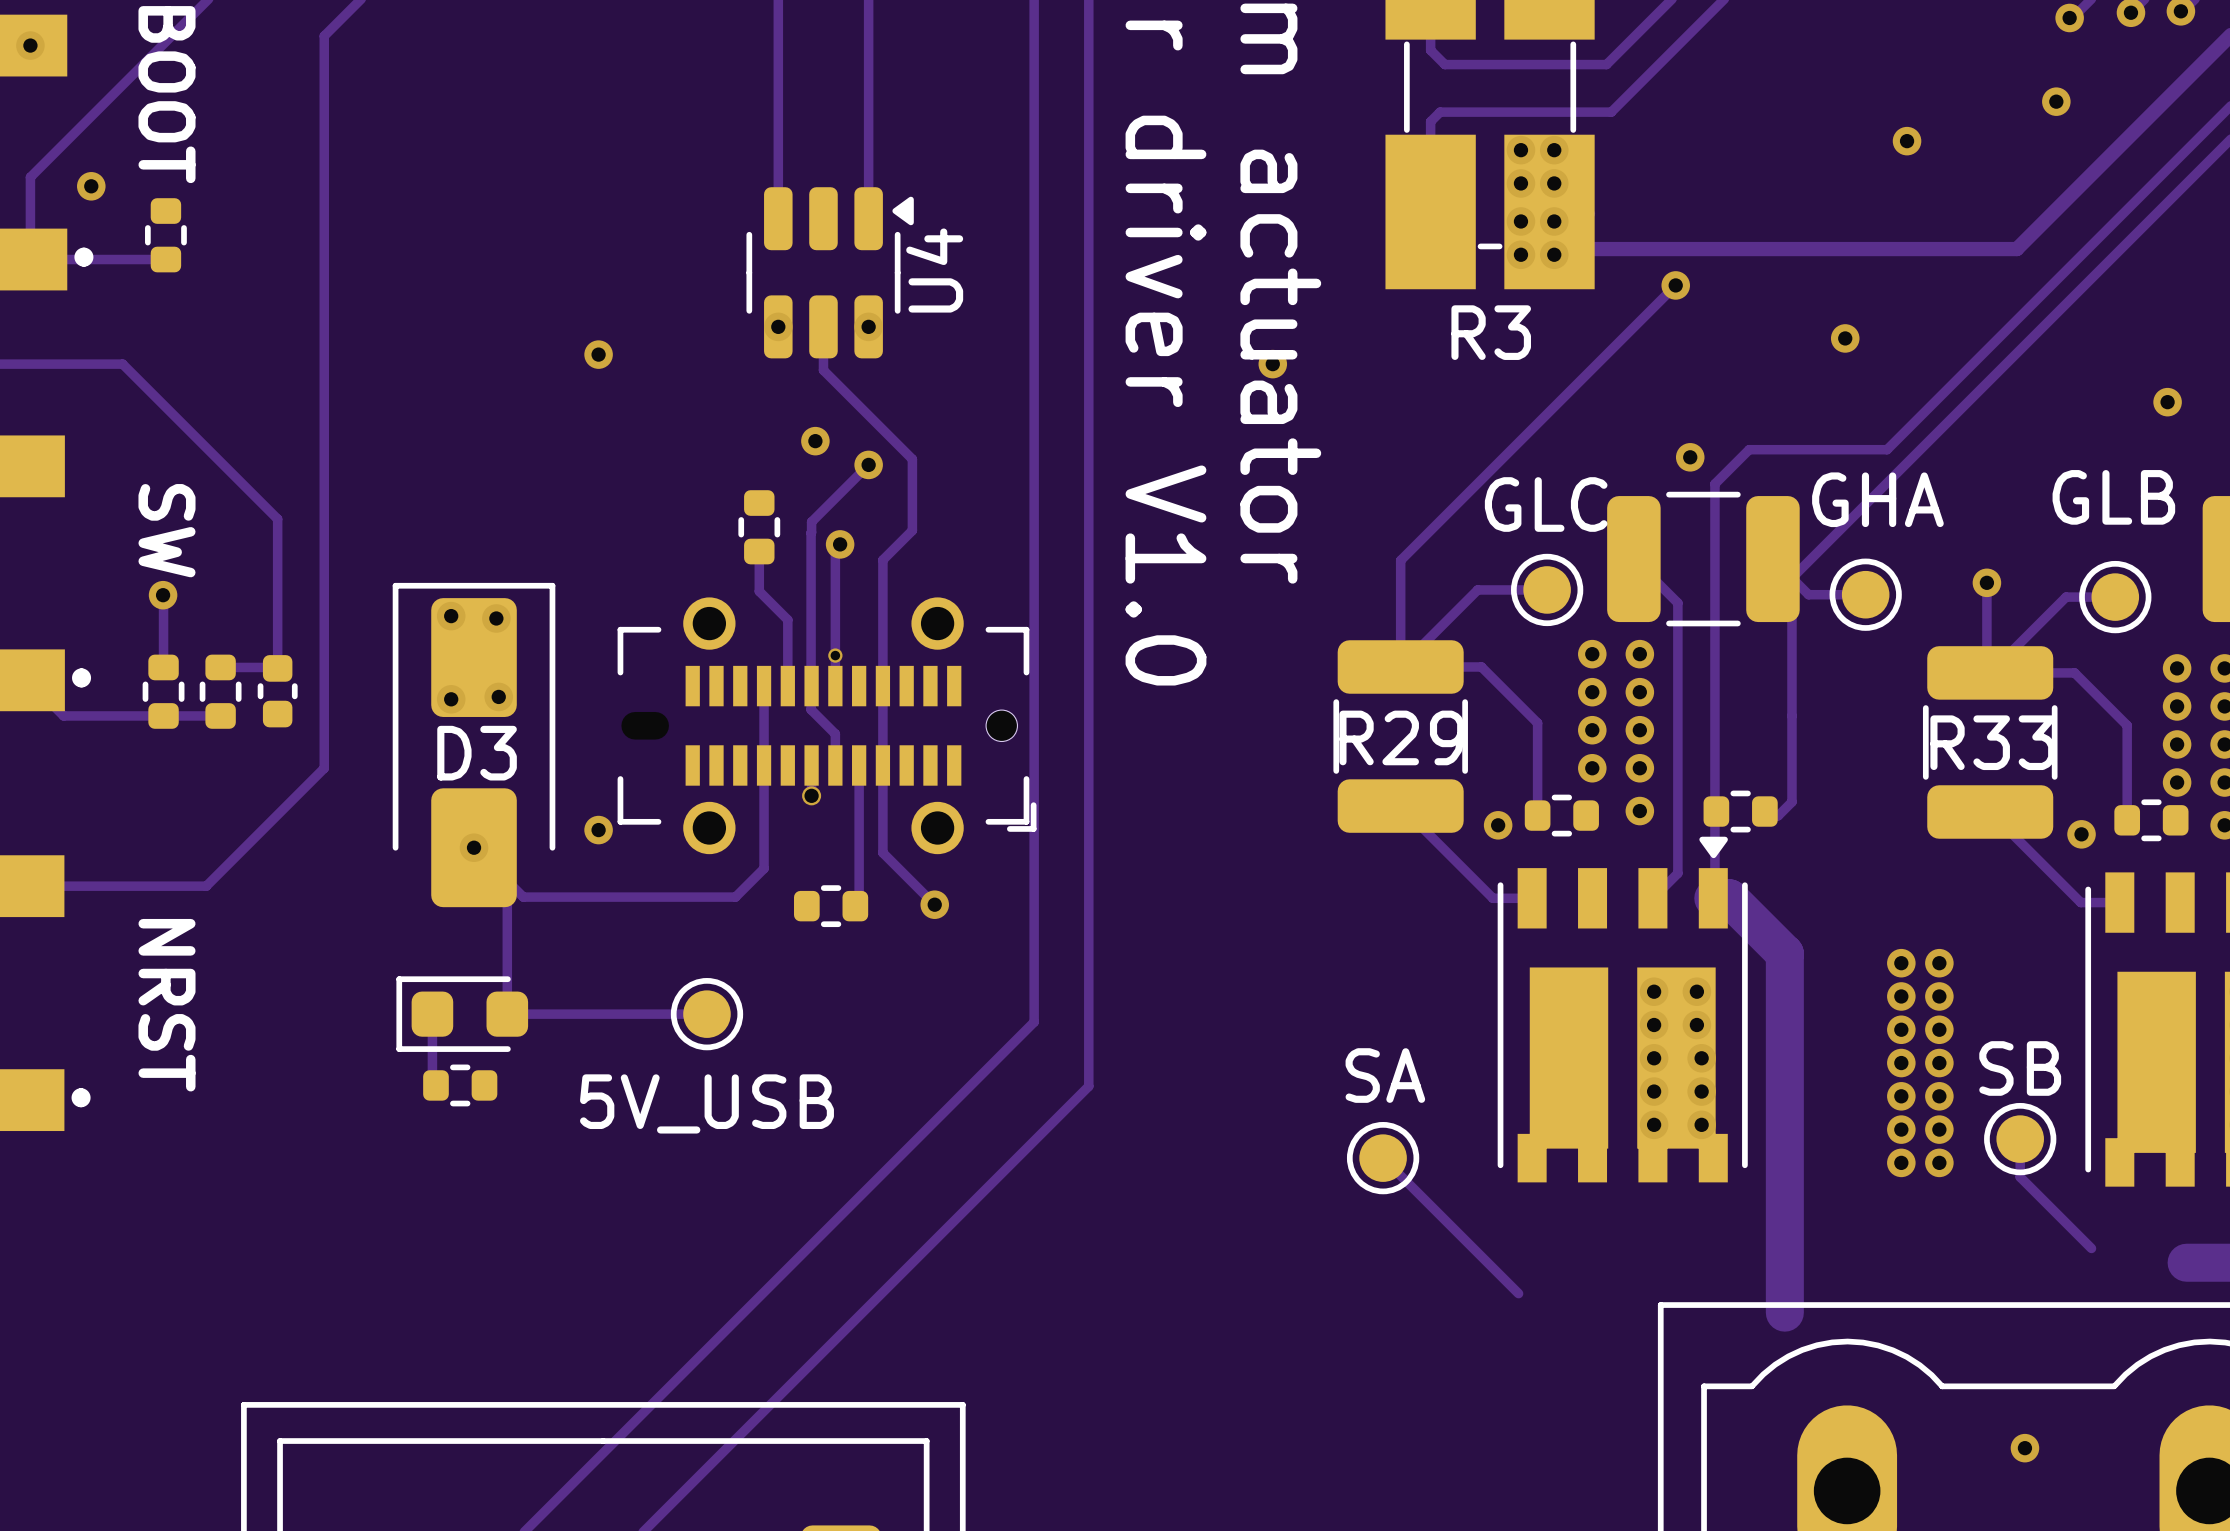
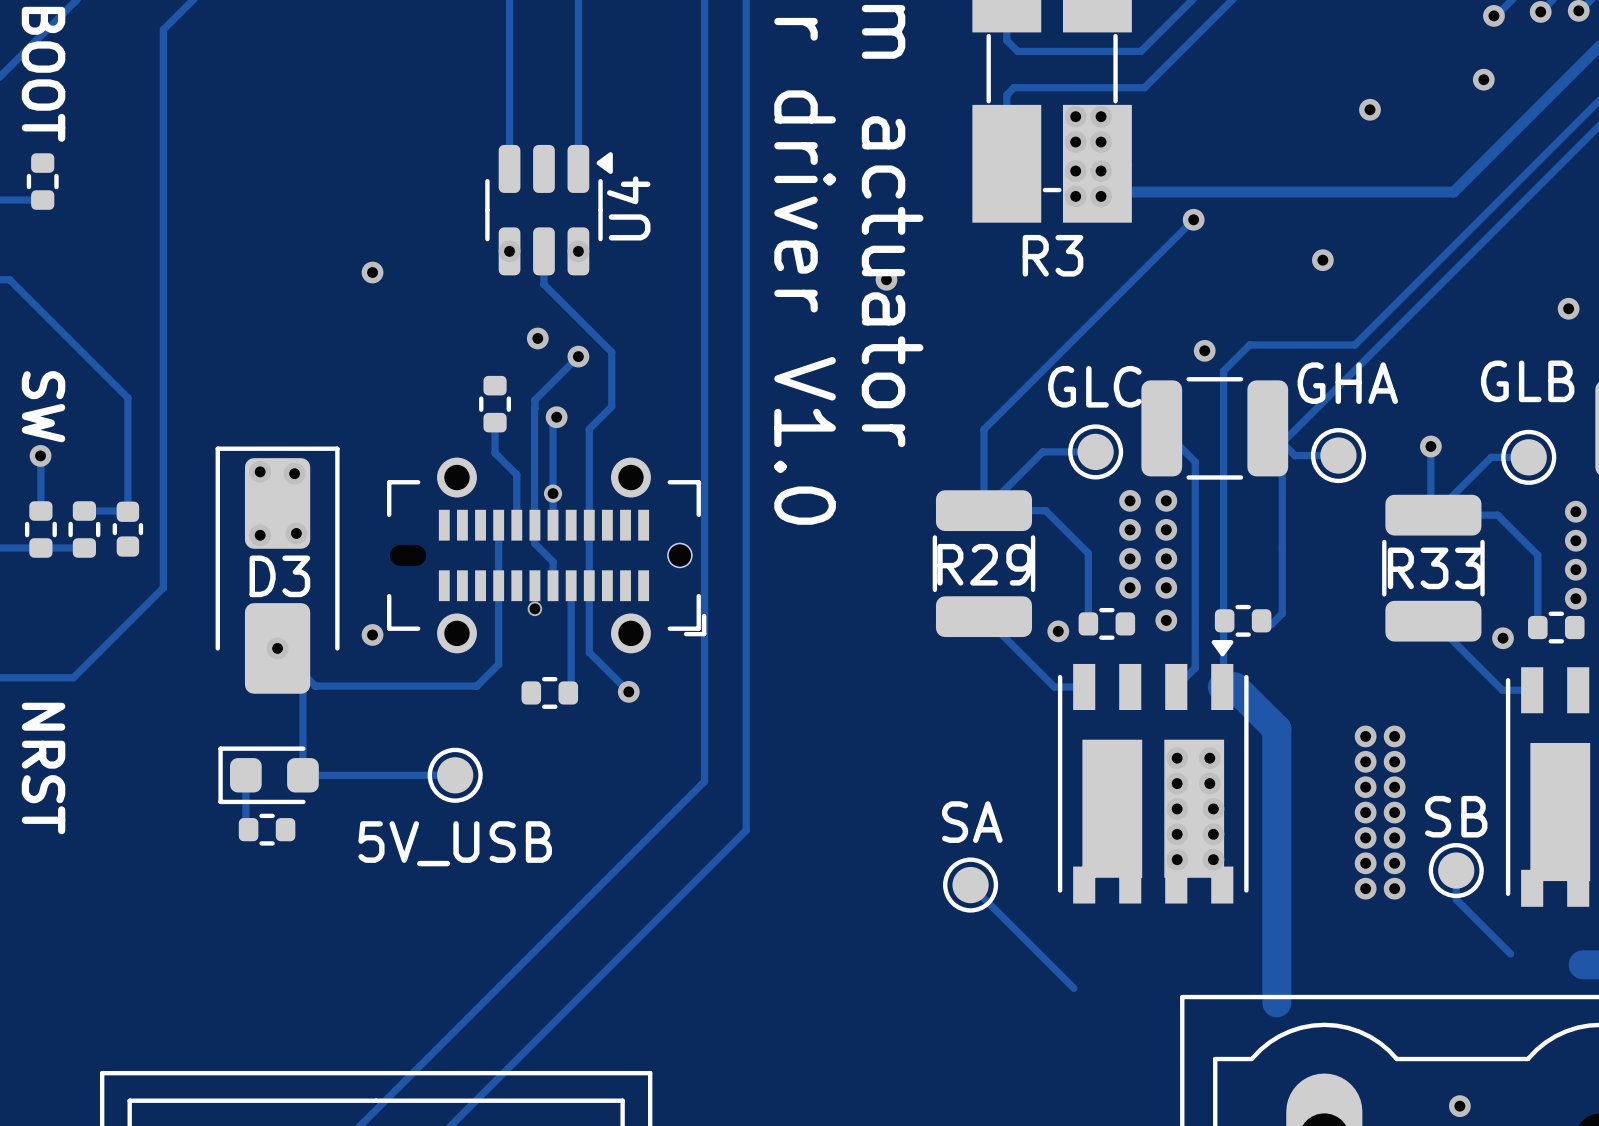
via size: [828, 648, 843, 663] -> [543, 484, 563, 503]

